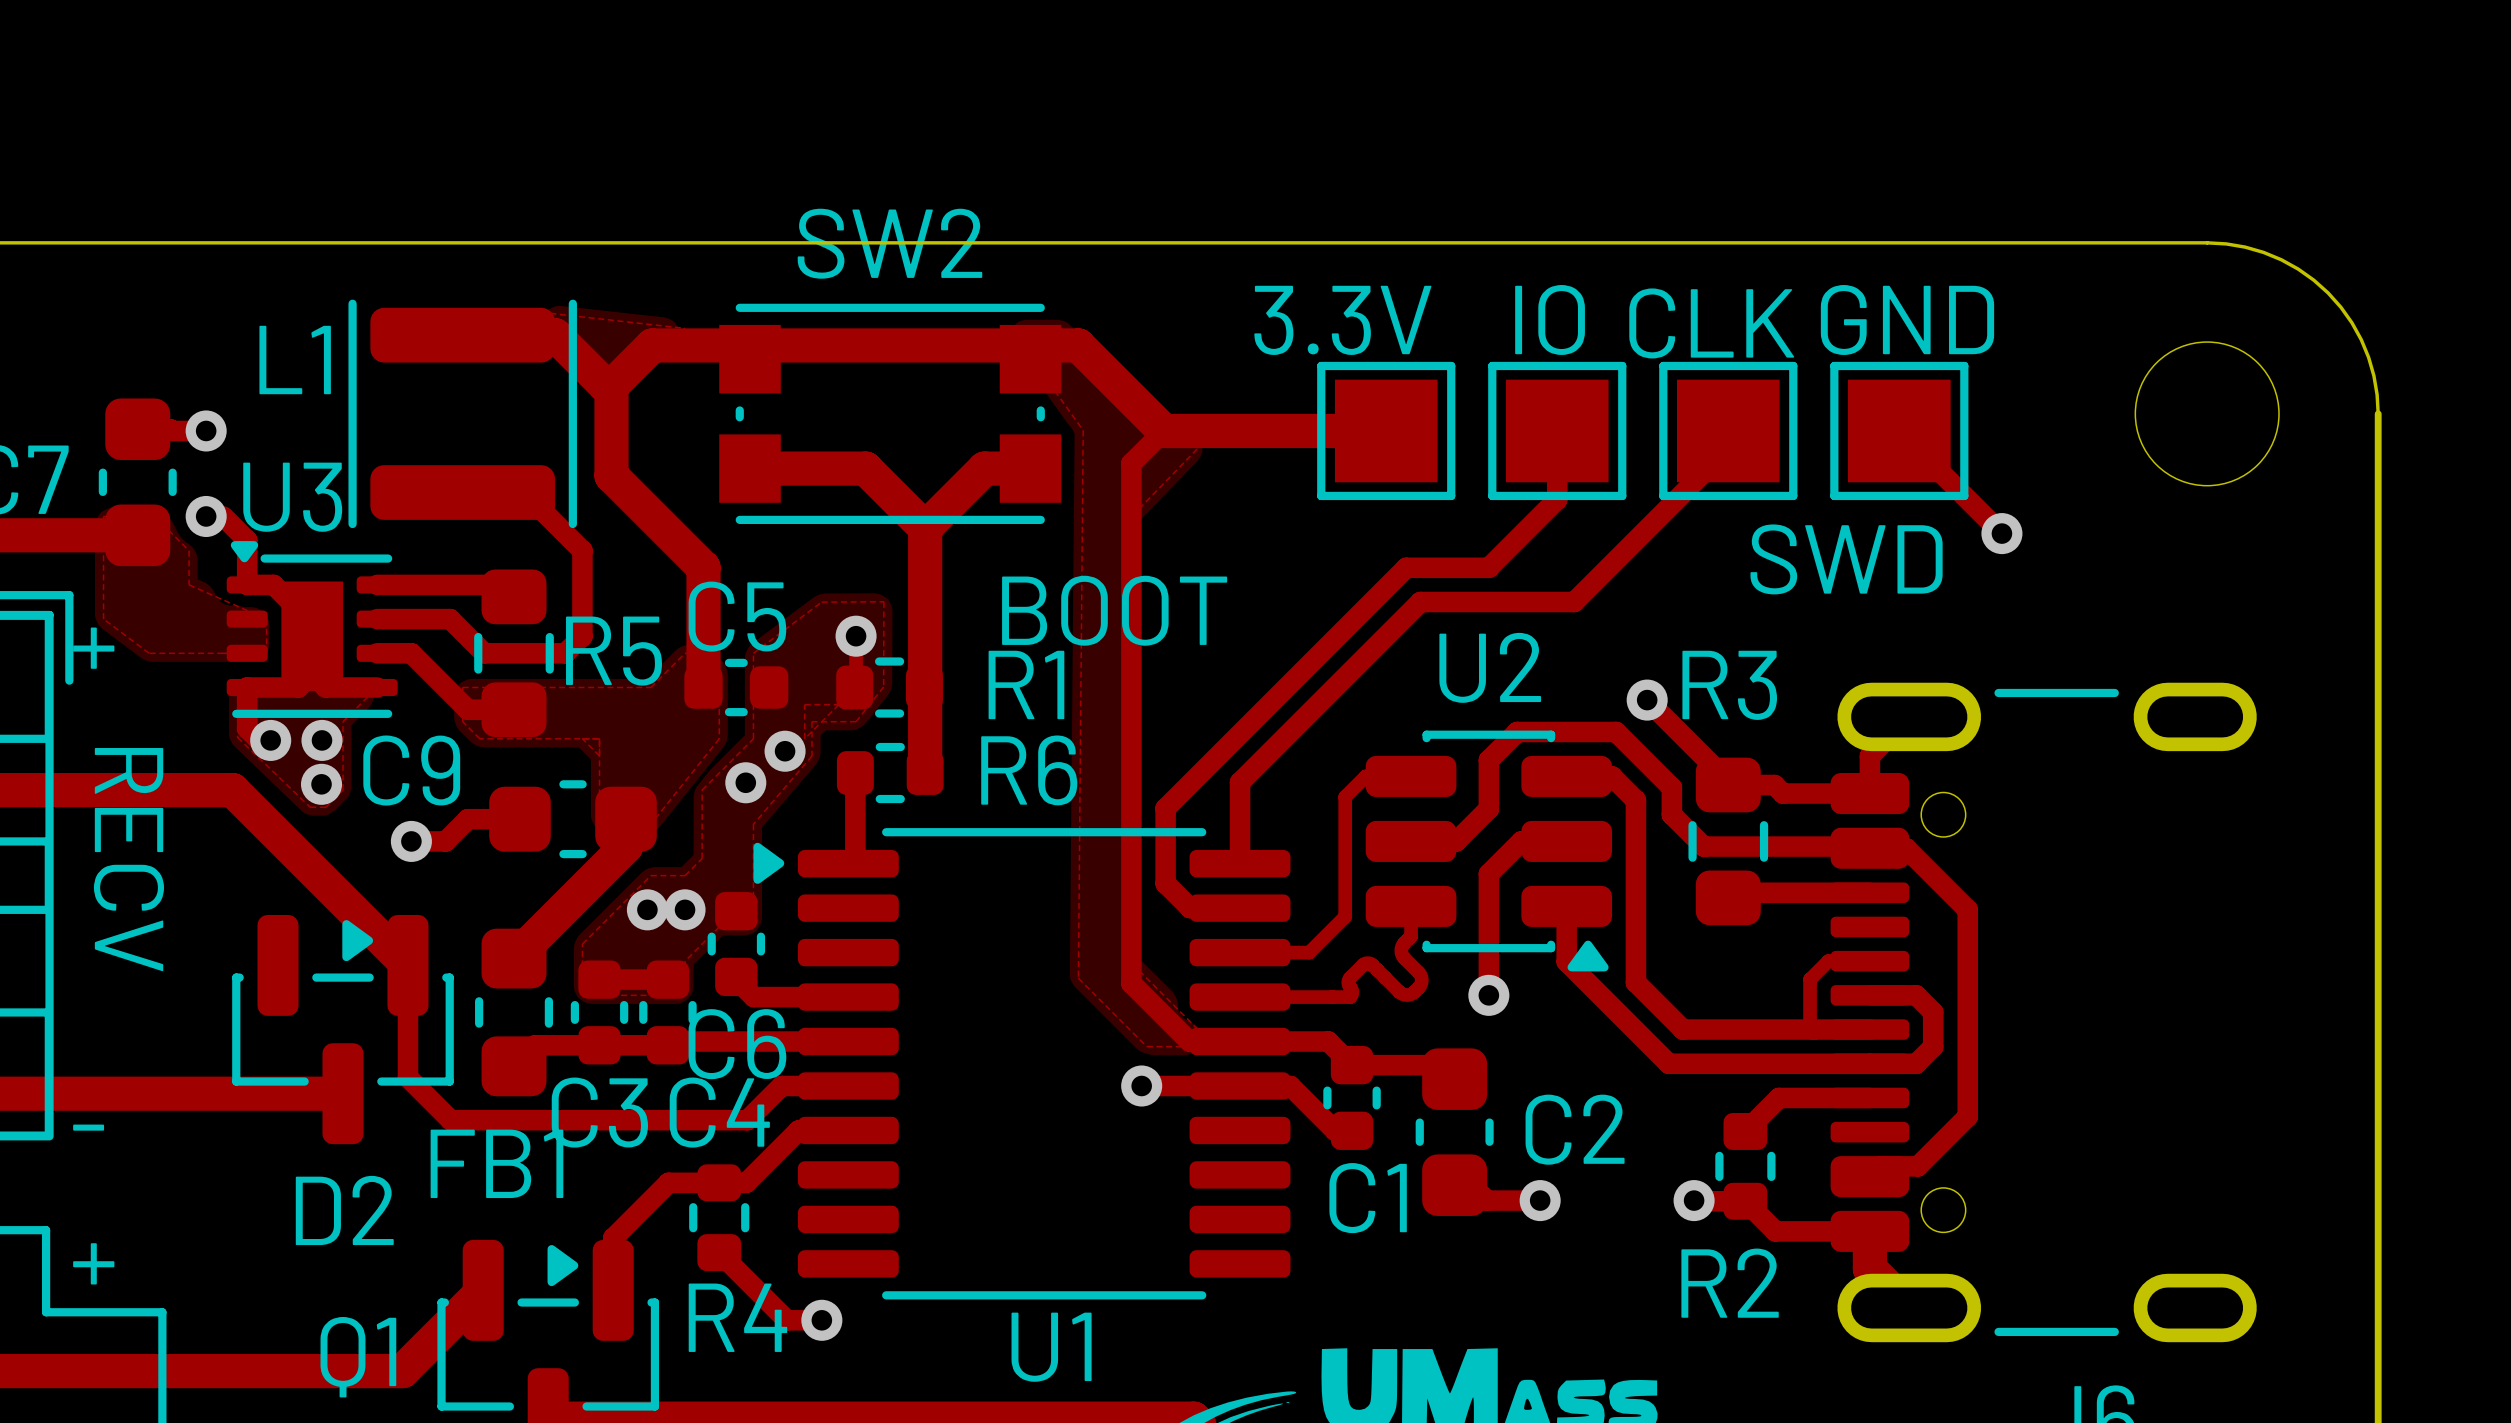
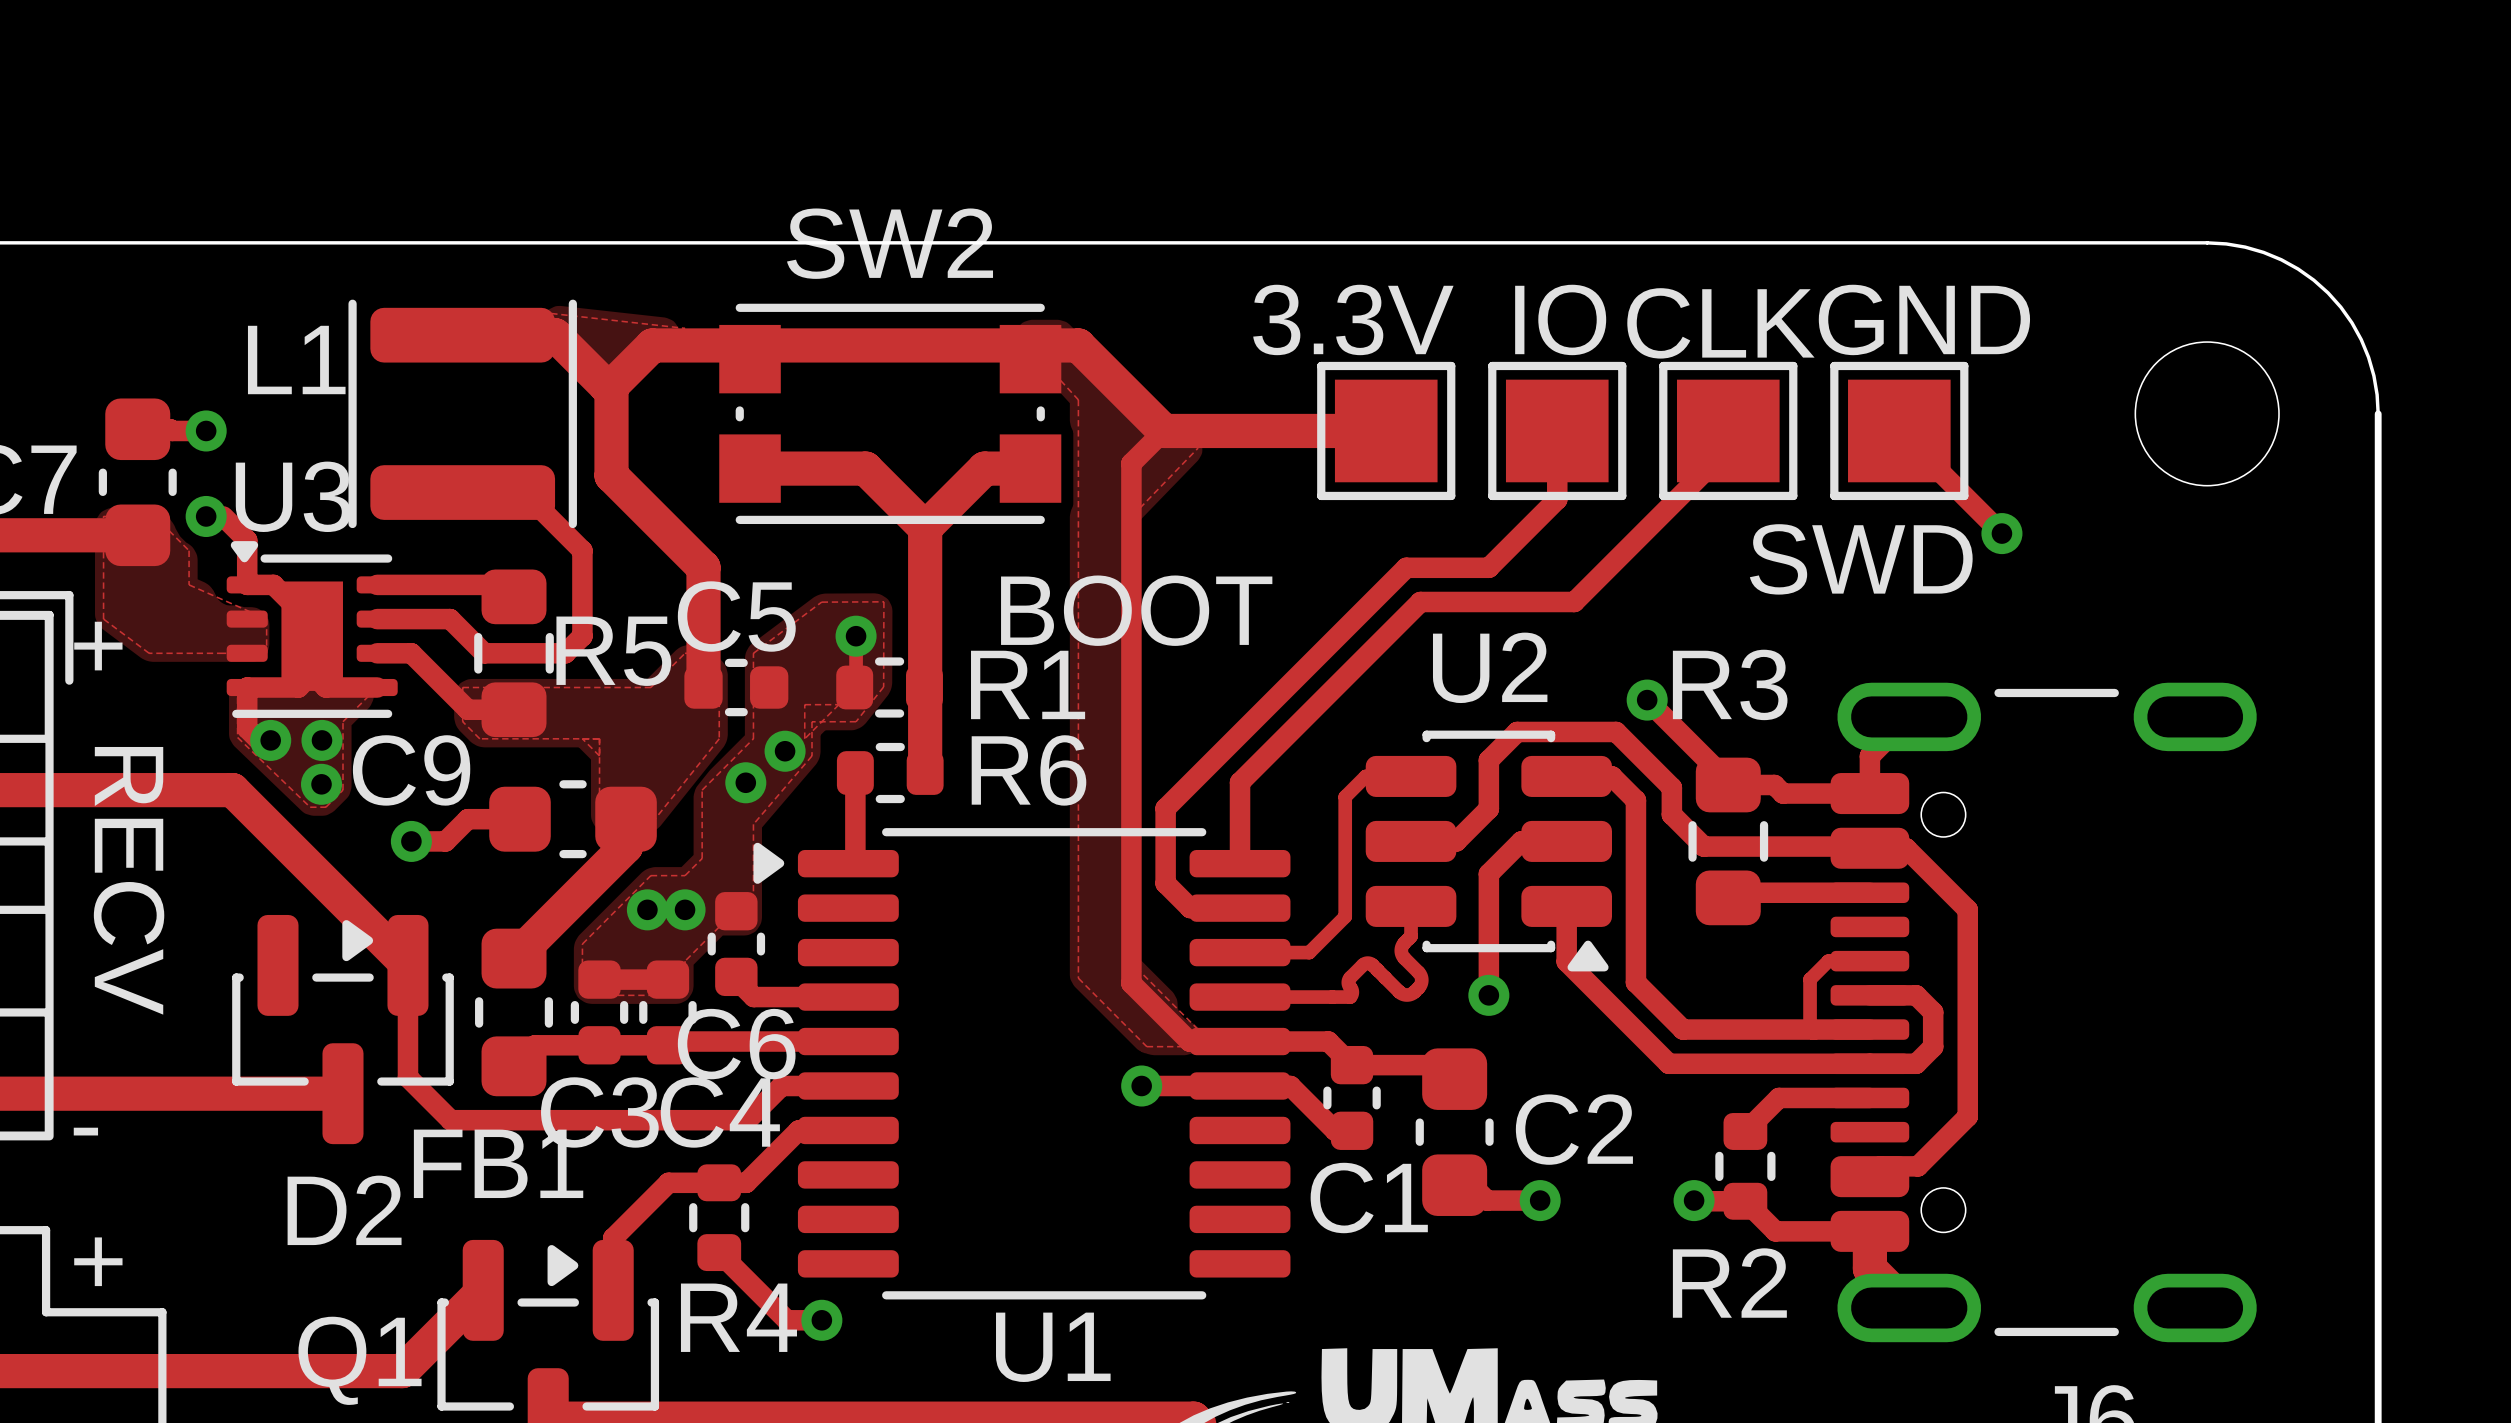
zone outline: (1012, 328) (1009, 328) (1083, 430) (1078, 978) -> (1012, 328) (1078, 399) (1078, 978)

